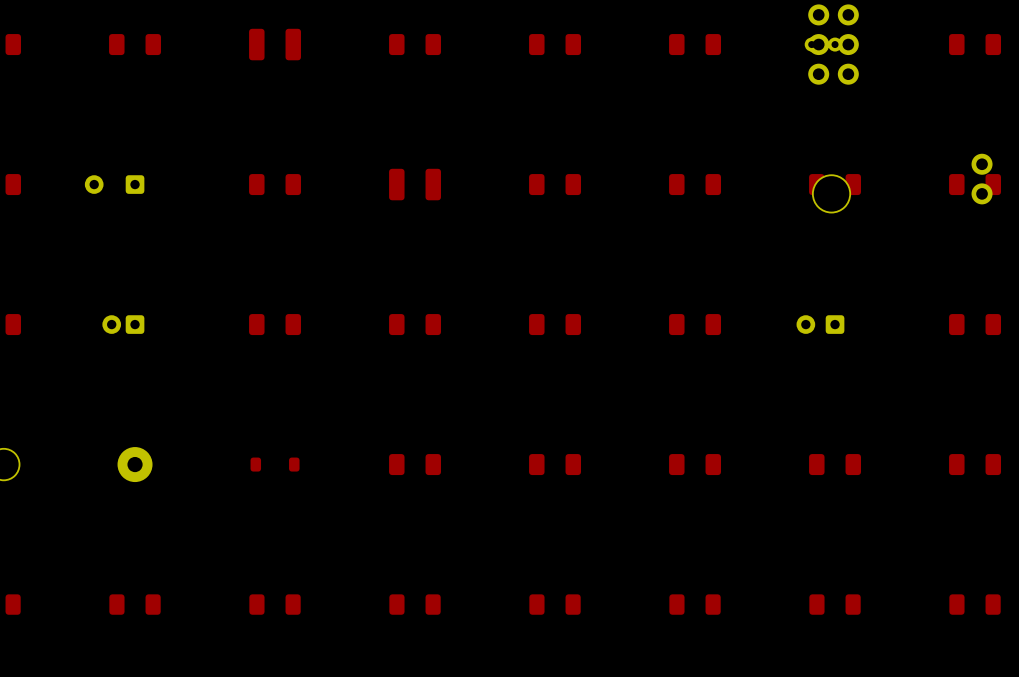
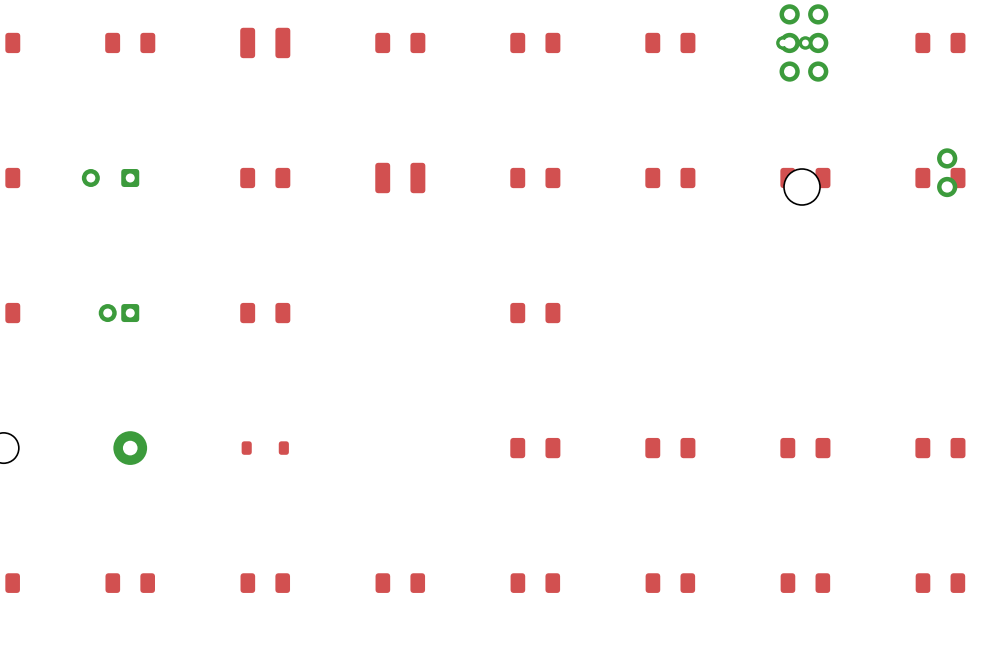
part: (415, 324) -> none
part: (695, 324) -> none
part: (820, 324) -> none
part: (975, 324) -> none
part: (415, 464) -> none

